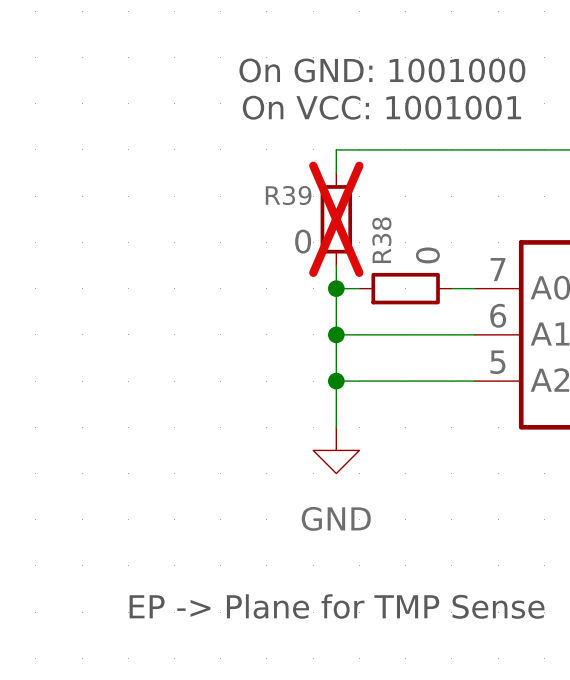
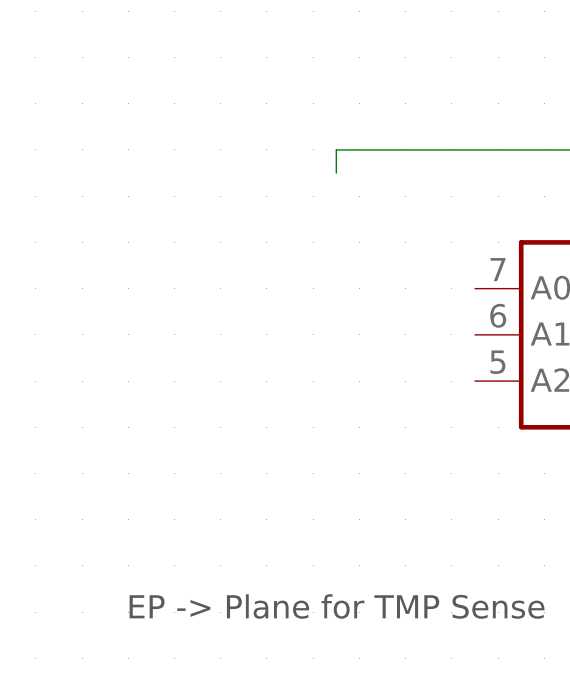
text: On GND: 1001000 (382, 70) -> none
text: On VCC: 1001001 (381, 107) -> none
R39: 0 (336, 219) -> none
wire: (336, 265) (336, 427) -> none
wire: (336, 288) (359, 288) -> none
junction: (336, 288) -> none
R38: 0 (405, 288) -> none
wire: (451, 288) (474, 288) -> none
wire: (336, 334) (474, 334) -> none
junction: (336, 334) -> none
wire: (336, 381) (474, 381) -> none
junction: (336, 381) -> none
power symbol: GND (336, 450) -> none

